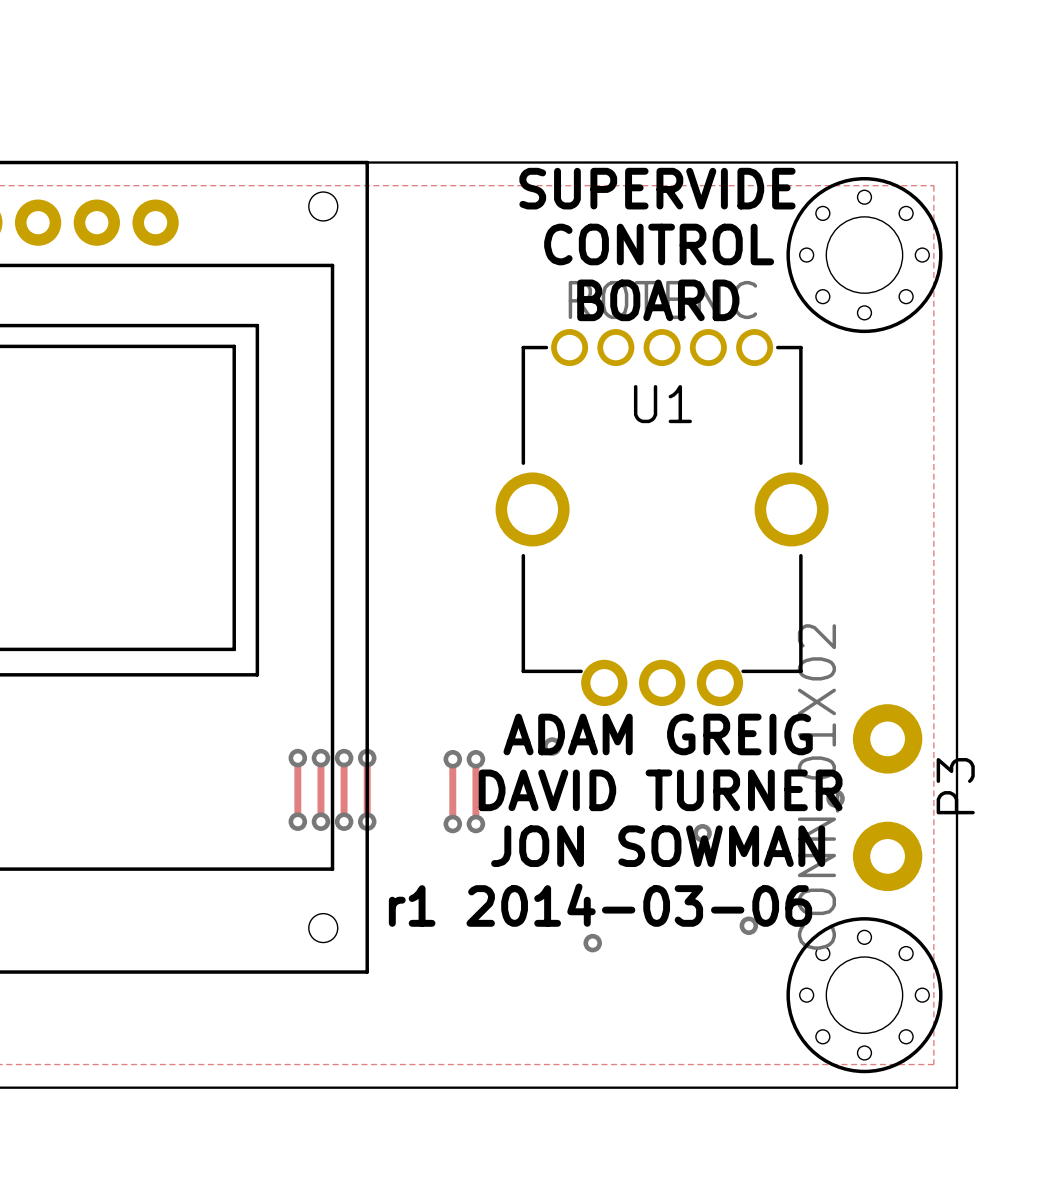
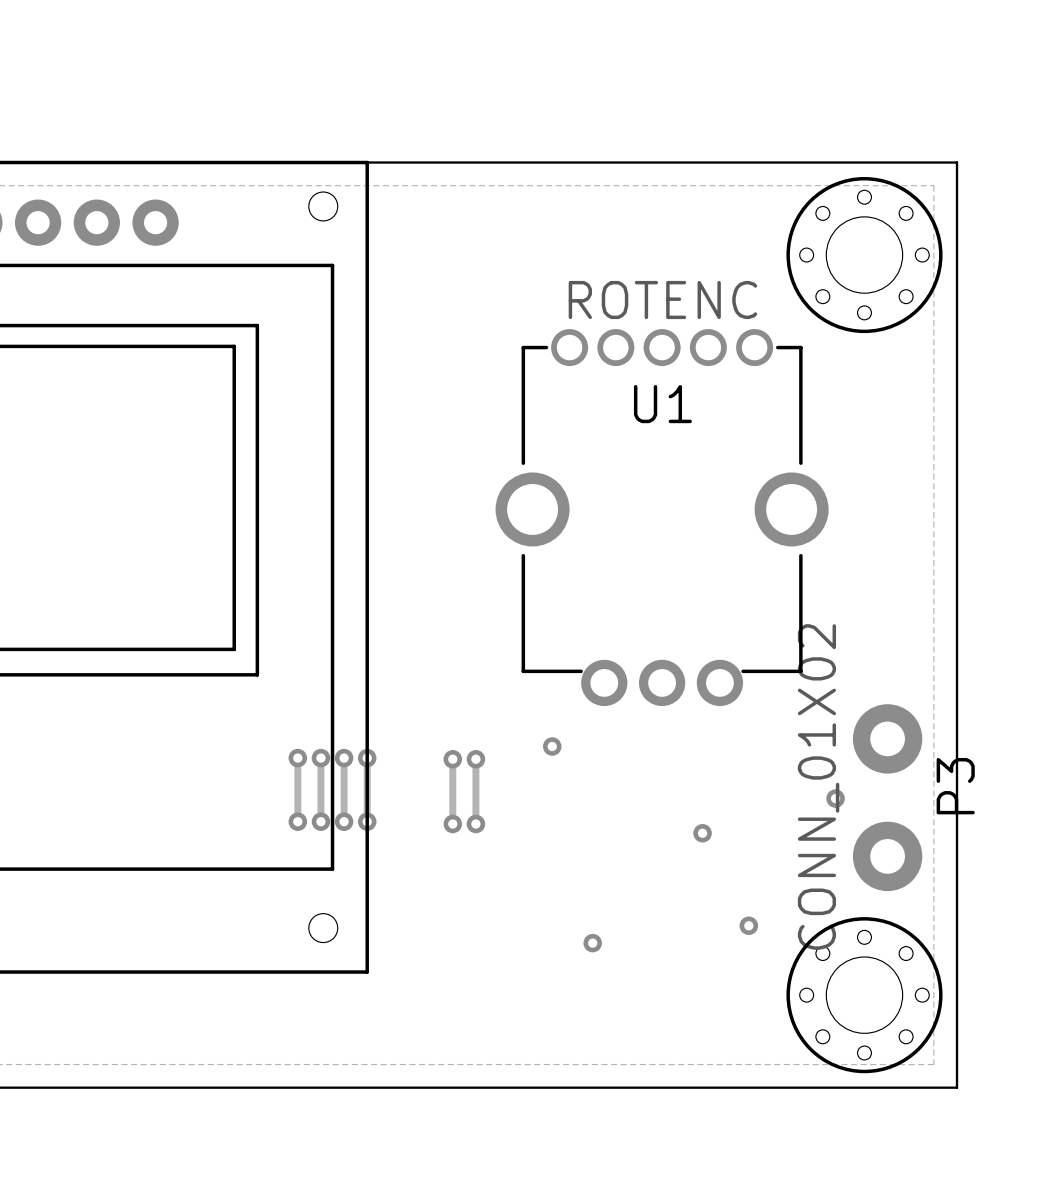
text: SUPERVIDE (657, 188) -> none
text: CONTROL (659, 244) -> none
text: BOARD (658, 300) -> none
text: ADAM GREIG (658, 734) -> none
text: DAVID TURNER (660, 790) -> none
text: JON SOWMAN (658, 846) -> none
text: r1 2014-03-06 (600, 905) -> none

